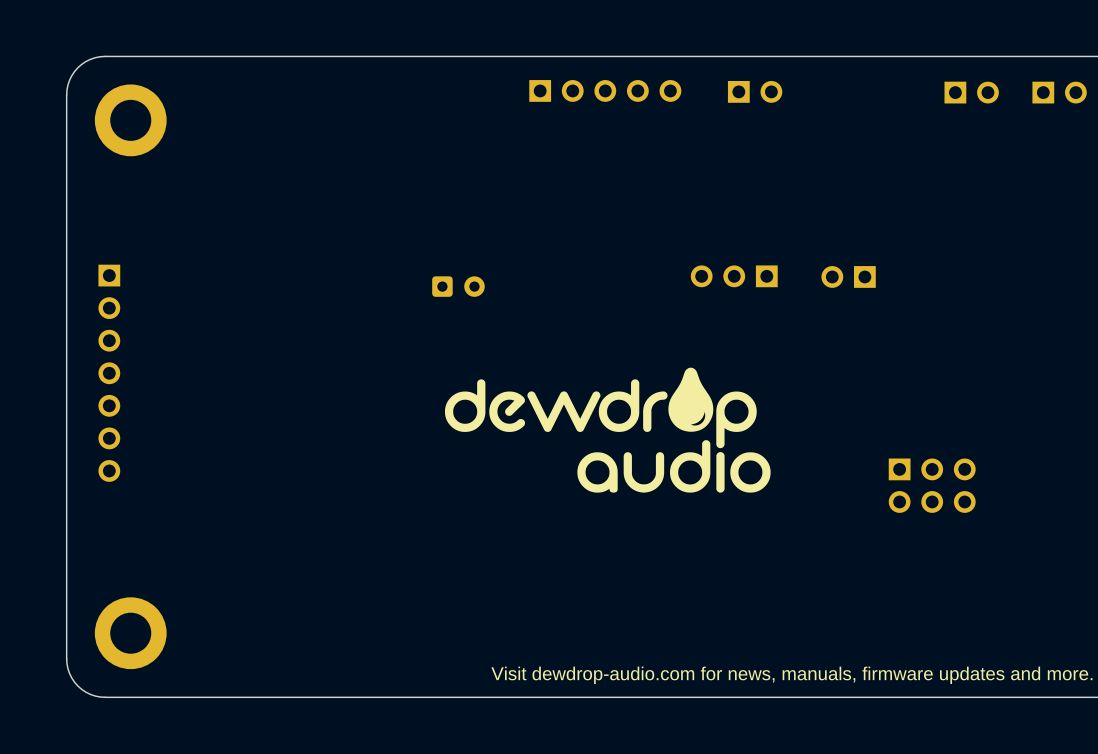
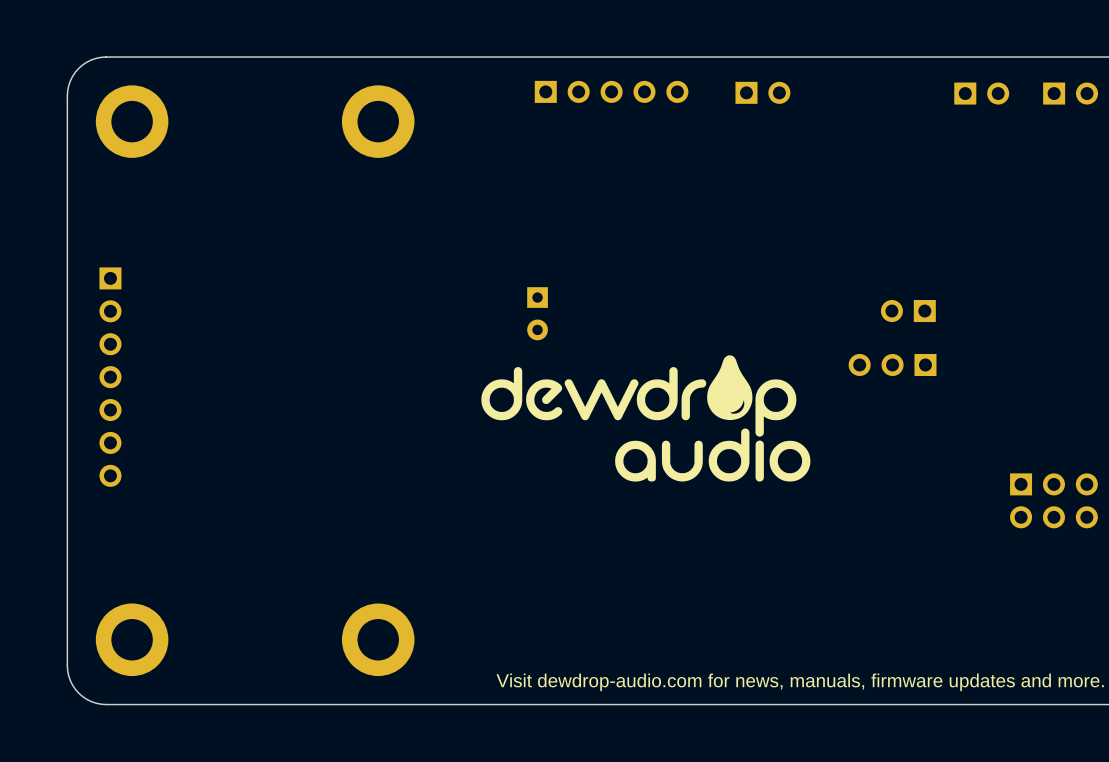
part: none -> (378, 121)
part position: (734, 276) -> (892, 364)
part position: (848, 276) -> (908, 311)
part: (458, 286) -> none
part: none -> (537, 313)
drawing position: (607, 430) -> (645, 418)
part position: (932, 485) -> (1053, 500)
part: none -> (378, 639)

